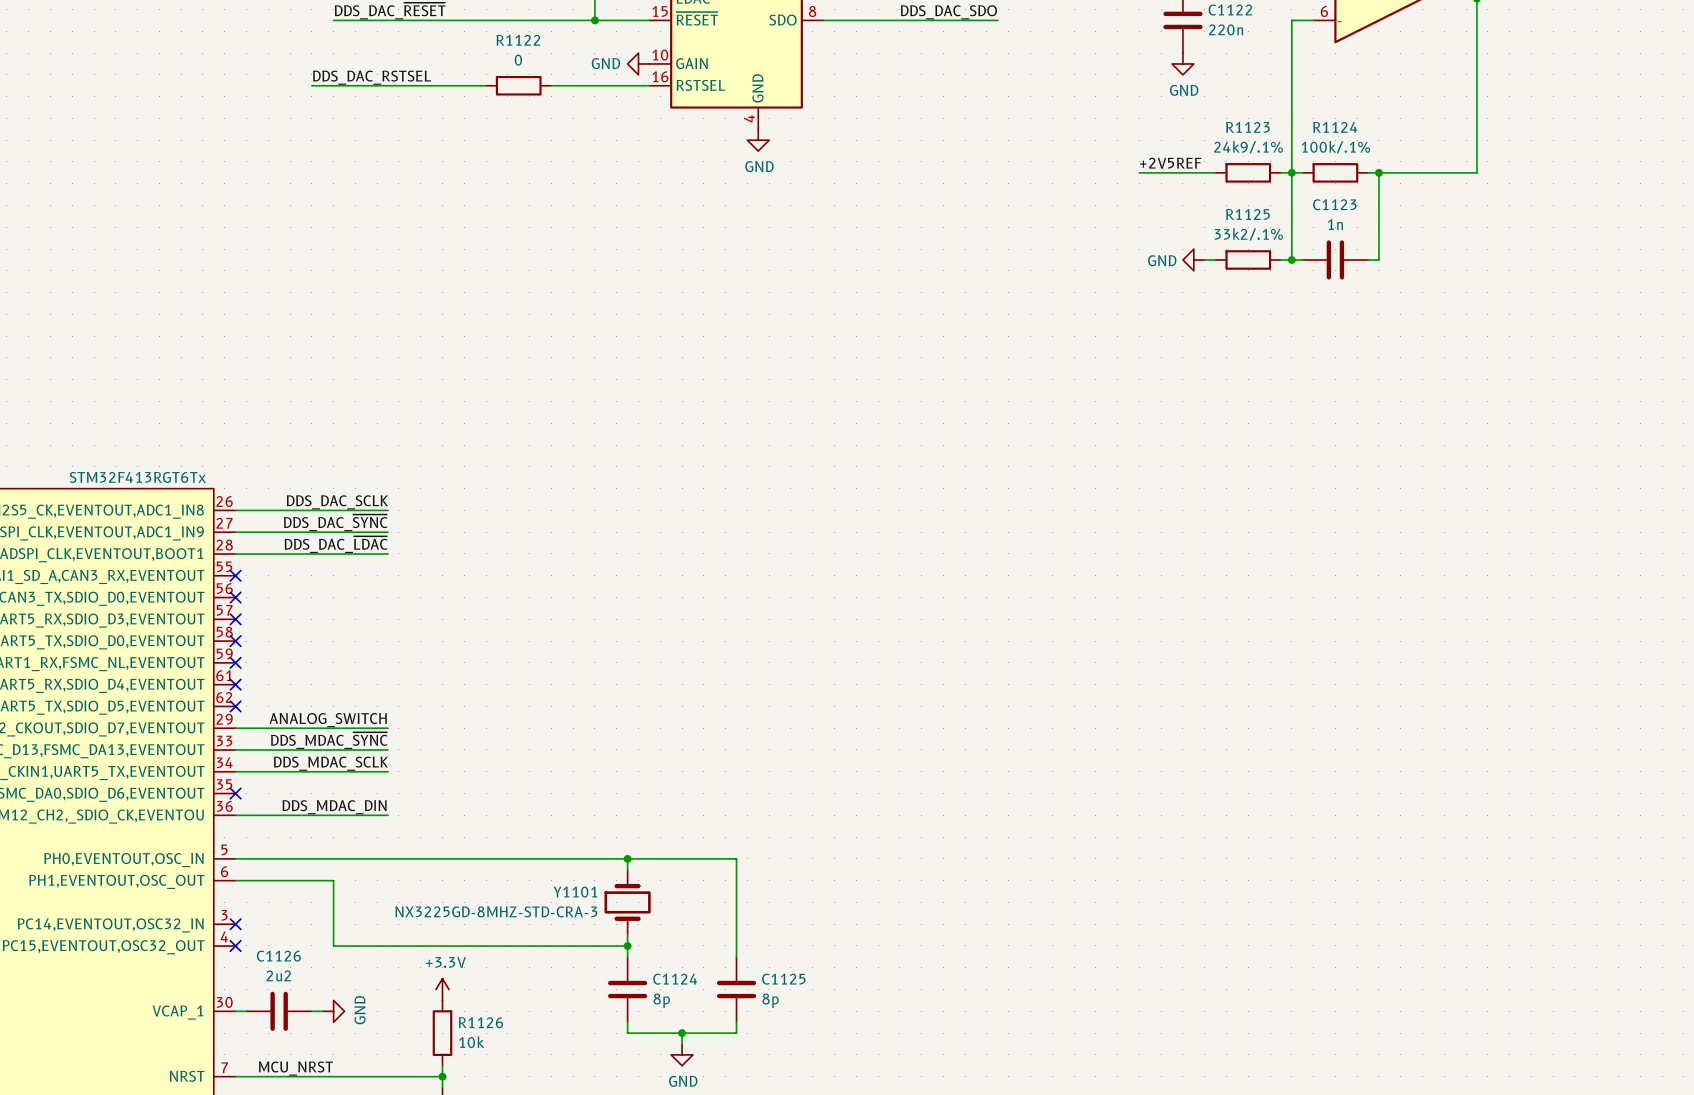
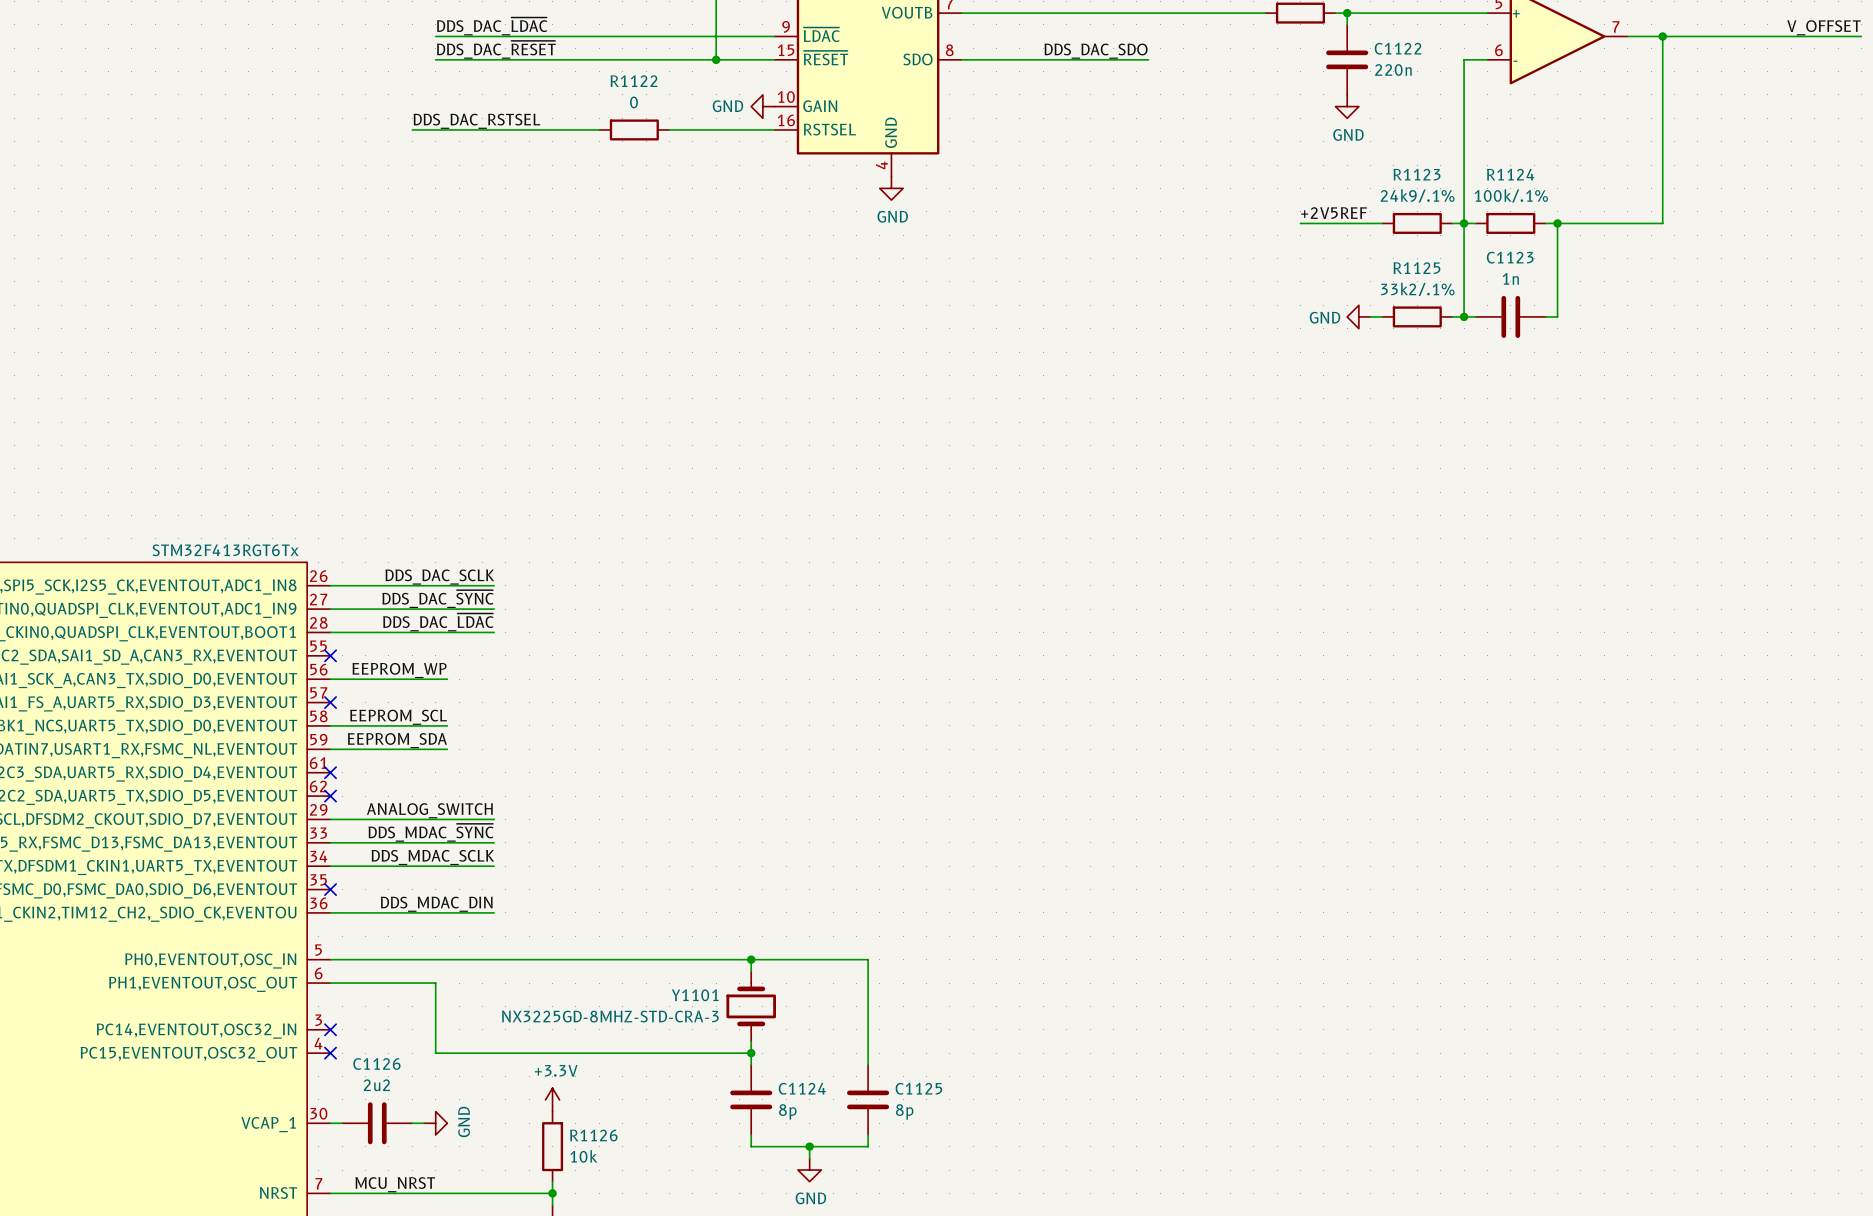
label: none -> EEPROM_WP (399, 670)
wire: none -> (330, 679) (447, 679)
no-connect mark: (235, 597) -> none
label: none -> EEPROM_SCL (398, 717)
wire: none -> (330, 725) (447, 725)
no-connect mark: (235, 641) -> none
label: none -> EEPROM_SDA (397, 740)
wire: none -> (330, 749) (447, 749)
no-connect mark: (235, 662) -> none

